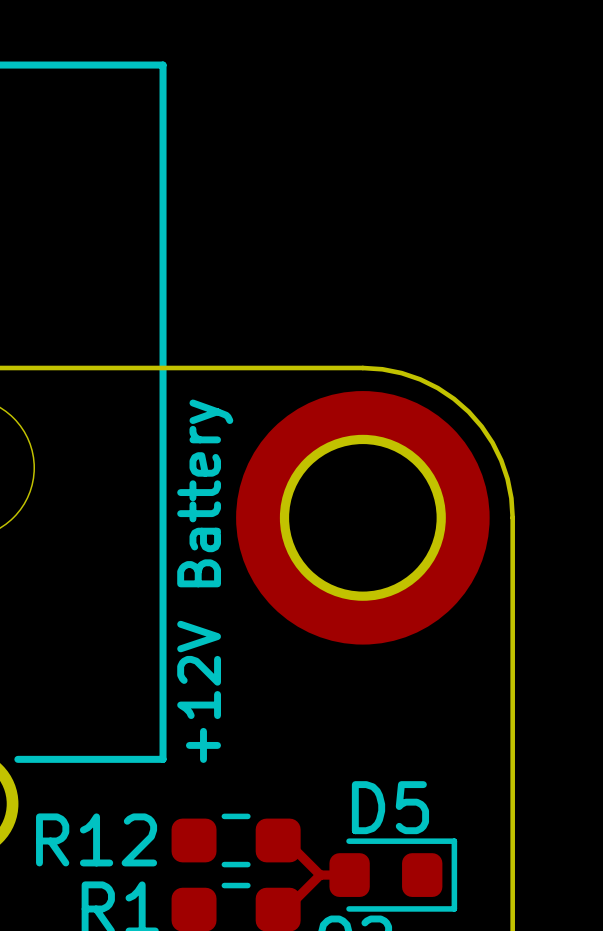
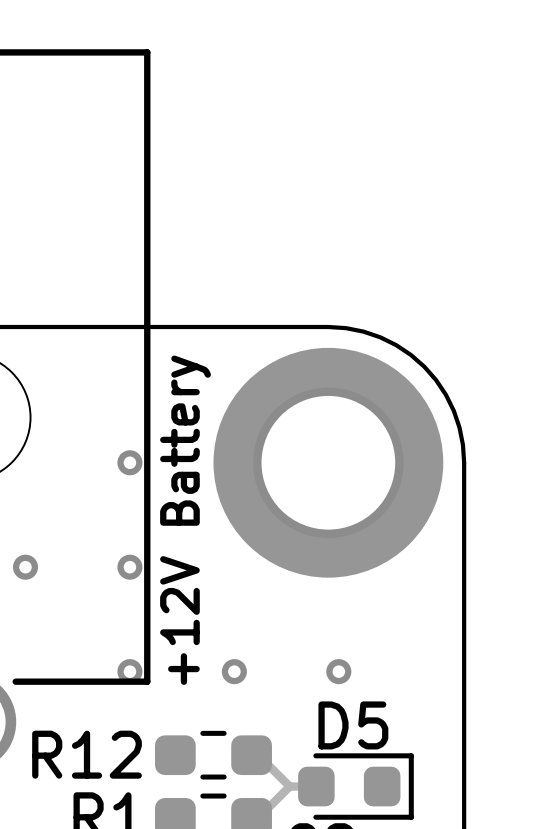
via: none -> (129, 462)
via: none -> (25, 567)
via: none -> (129, 567)
via: none -> (129, 671)
via: none -> (234, 671)
via: none -> (338, 671)

